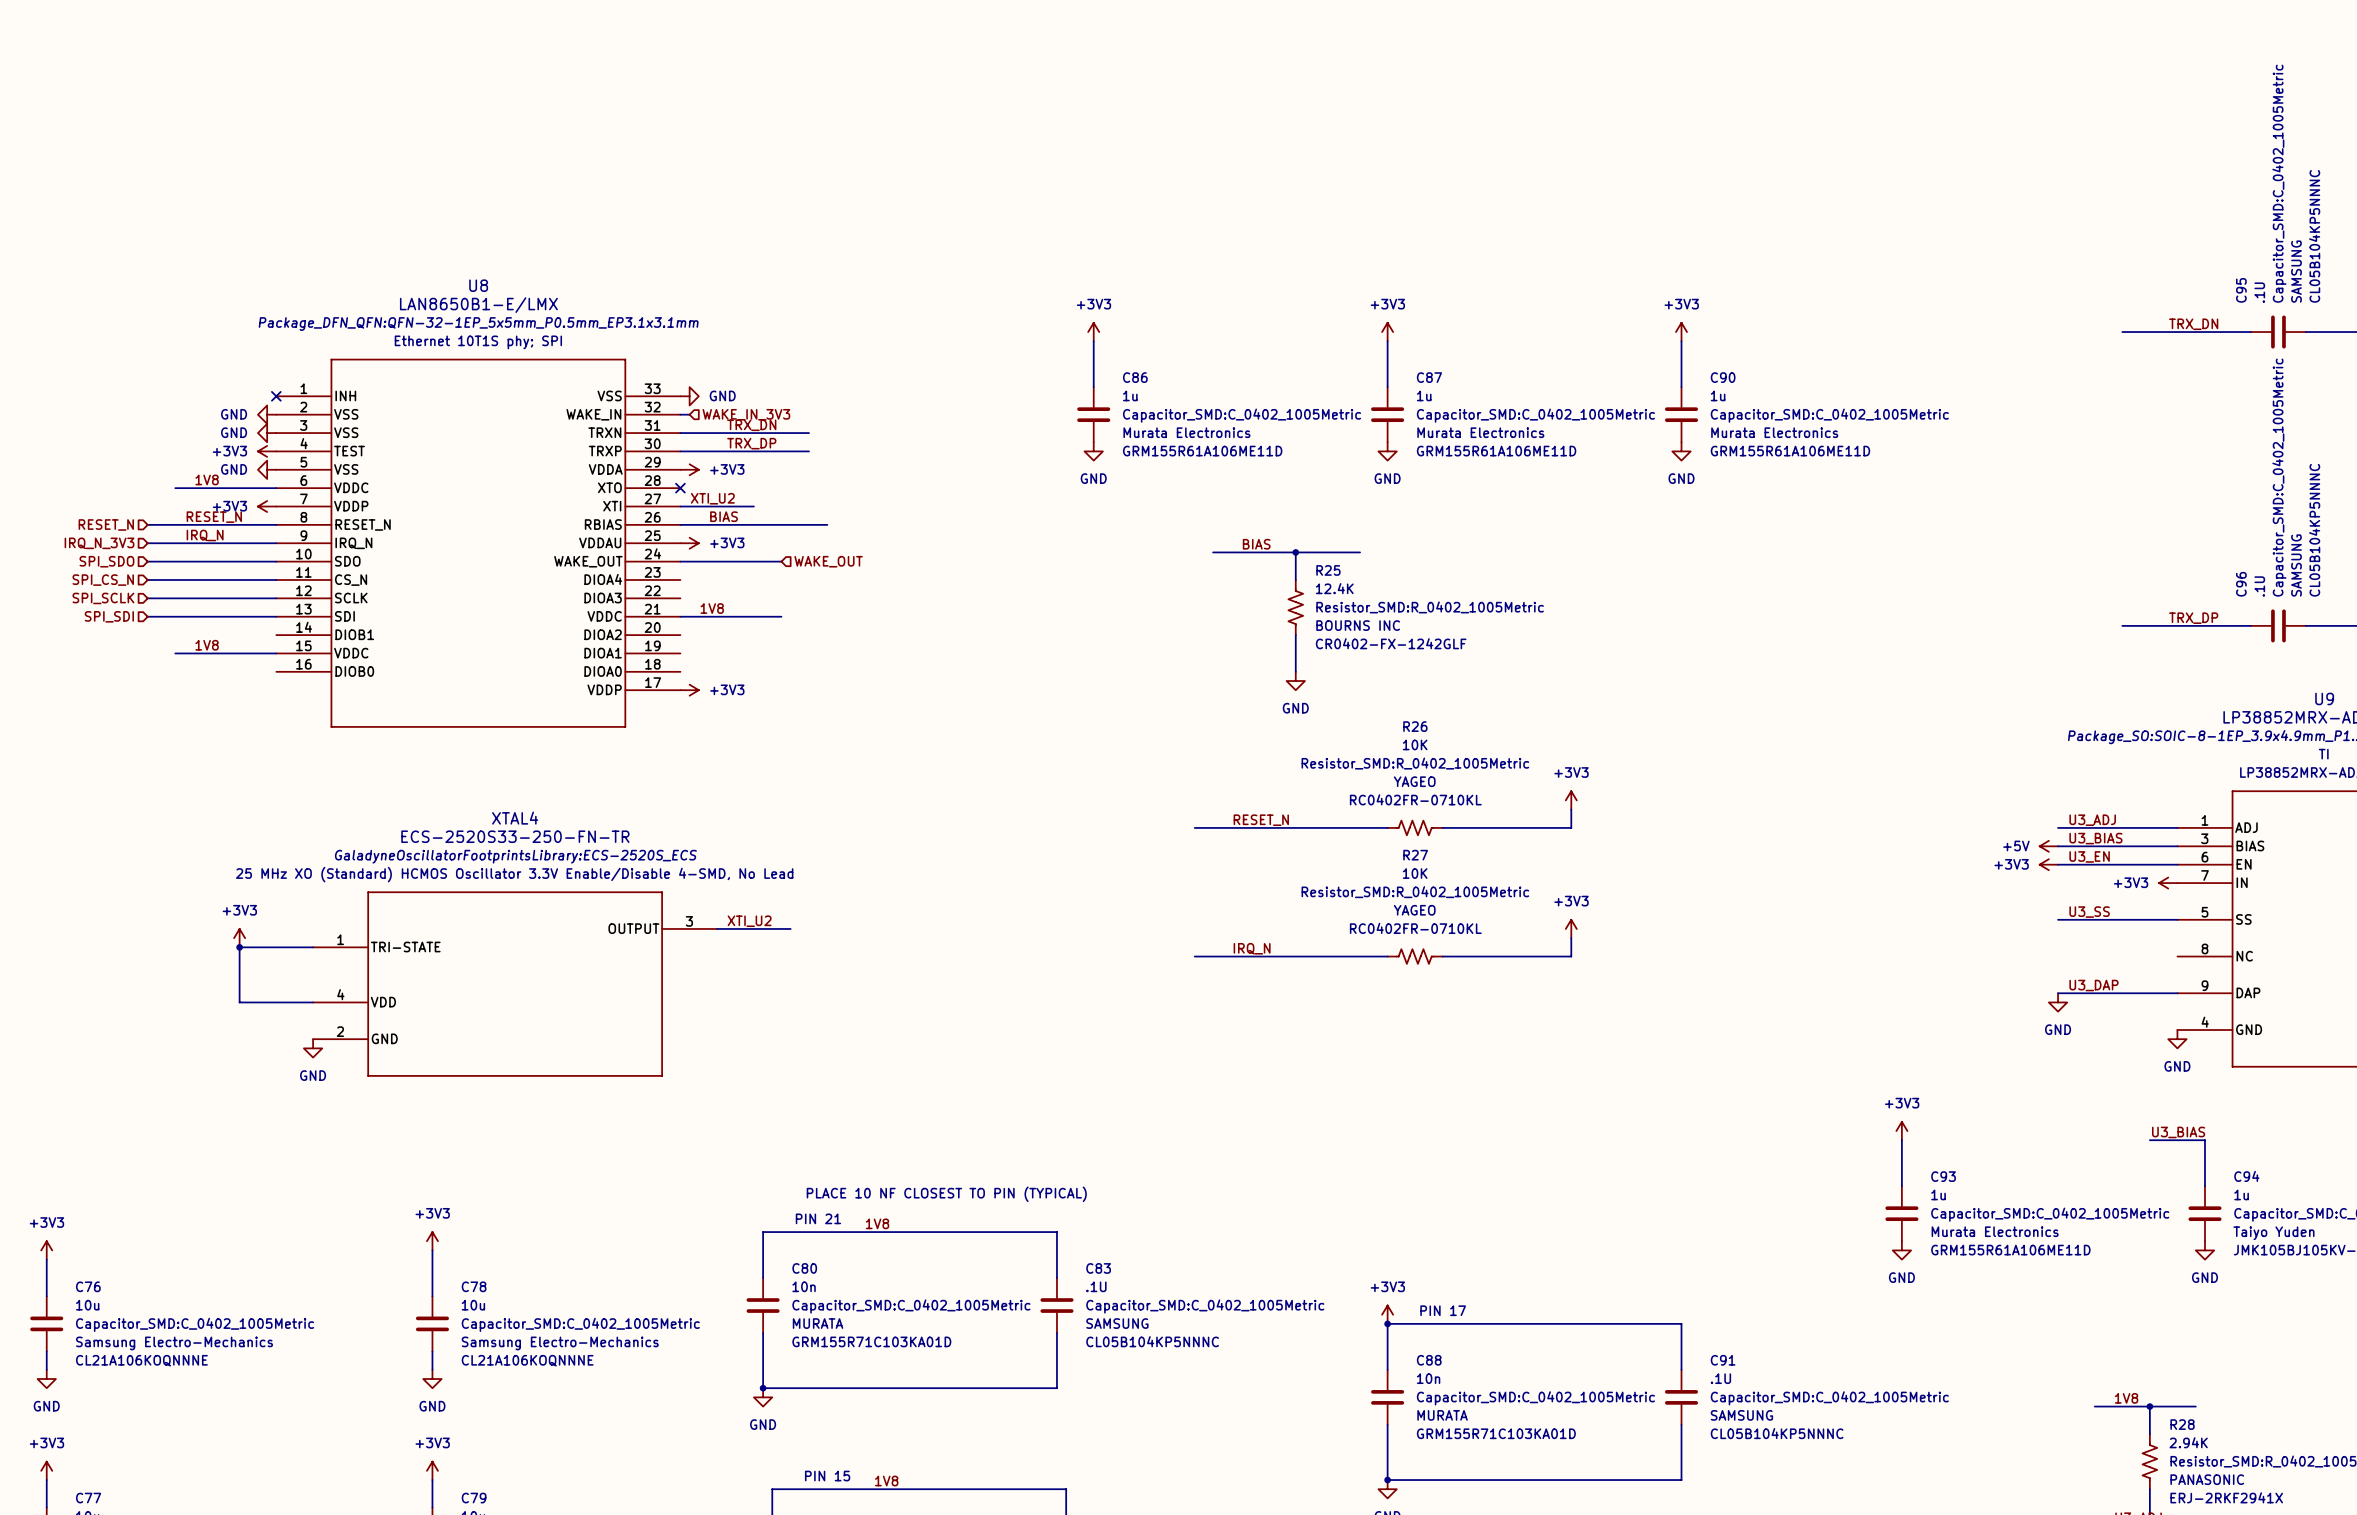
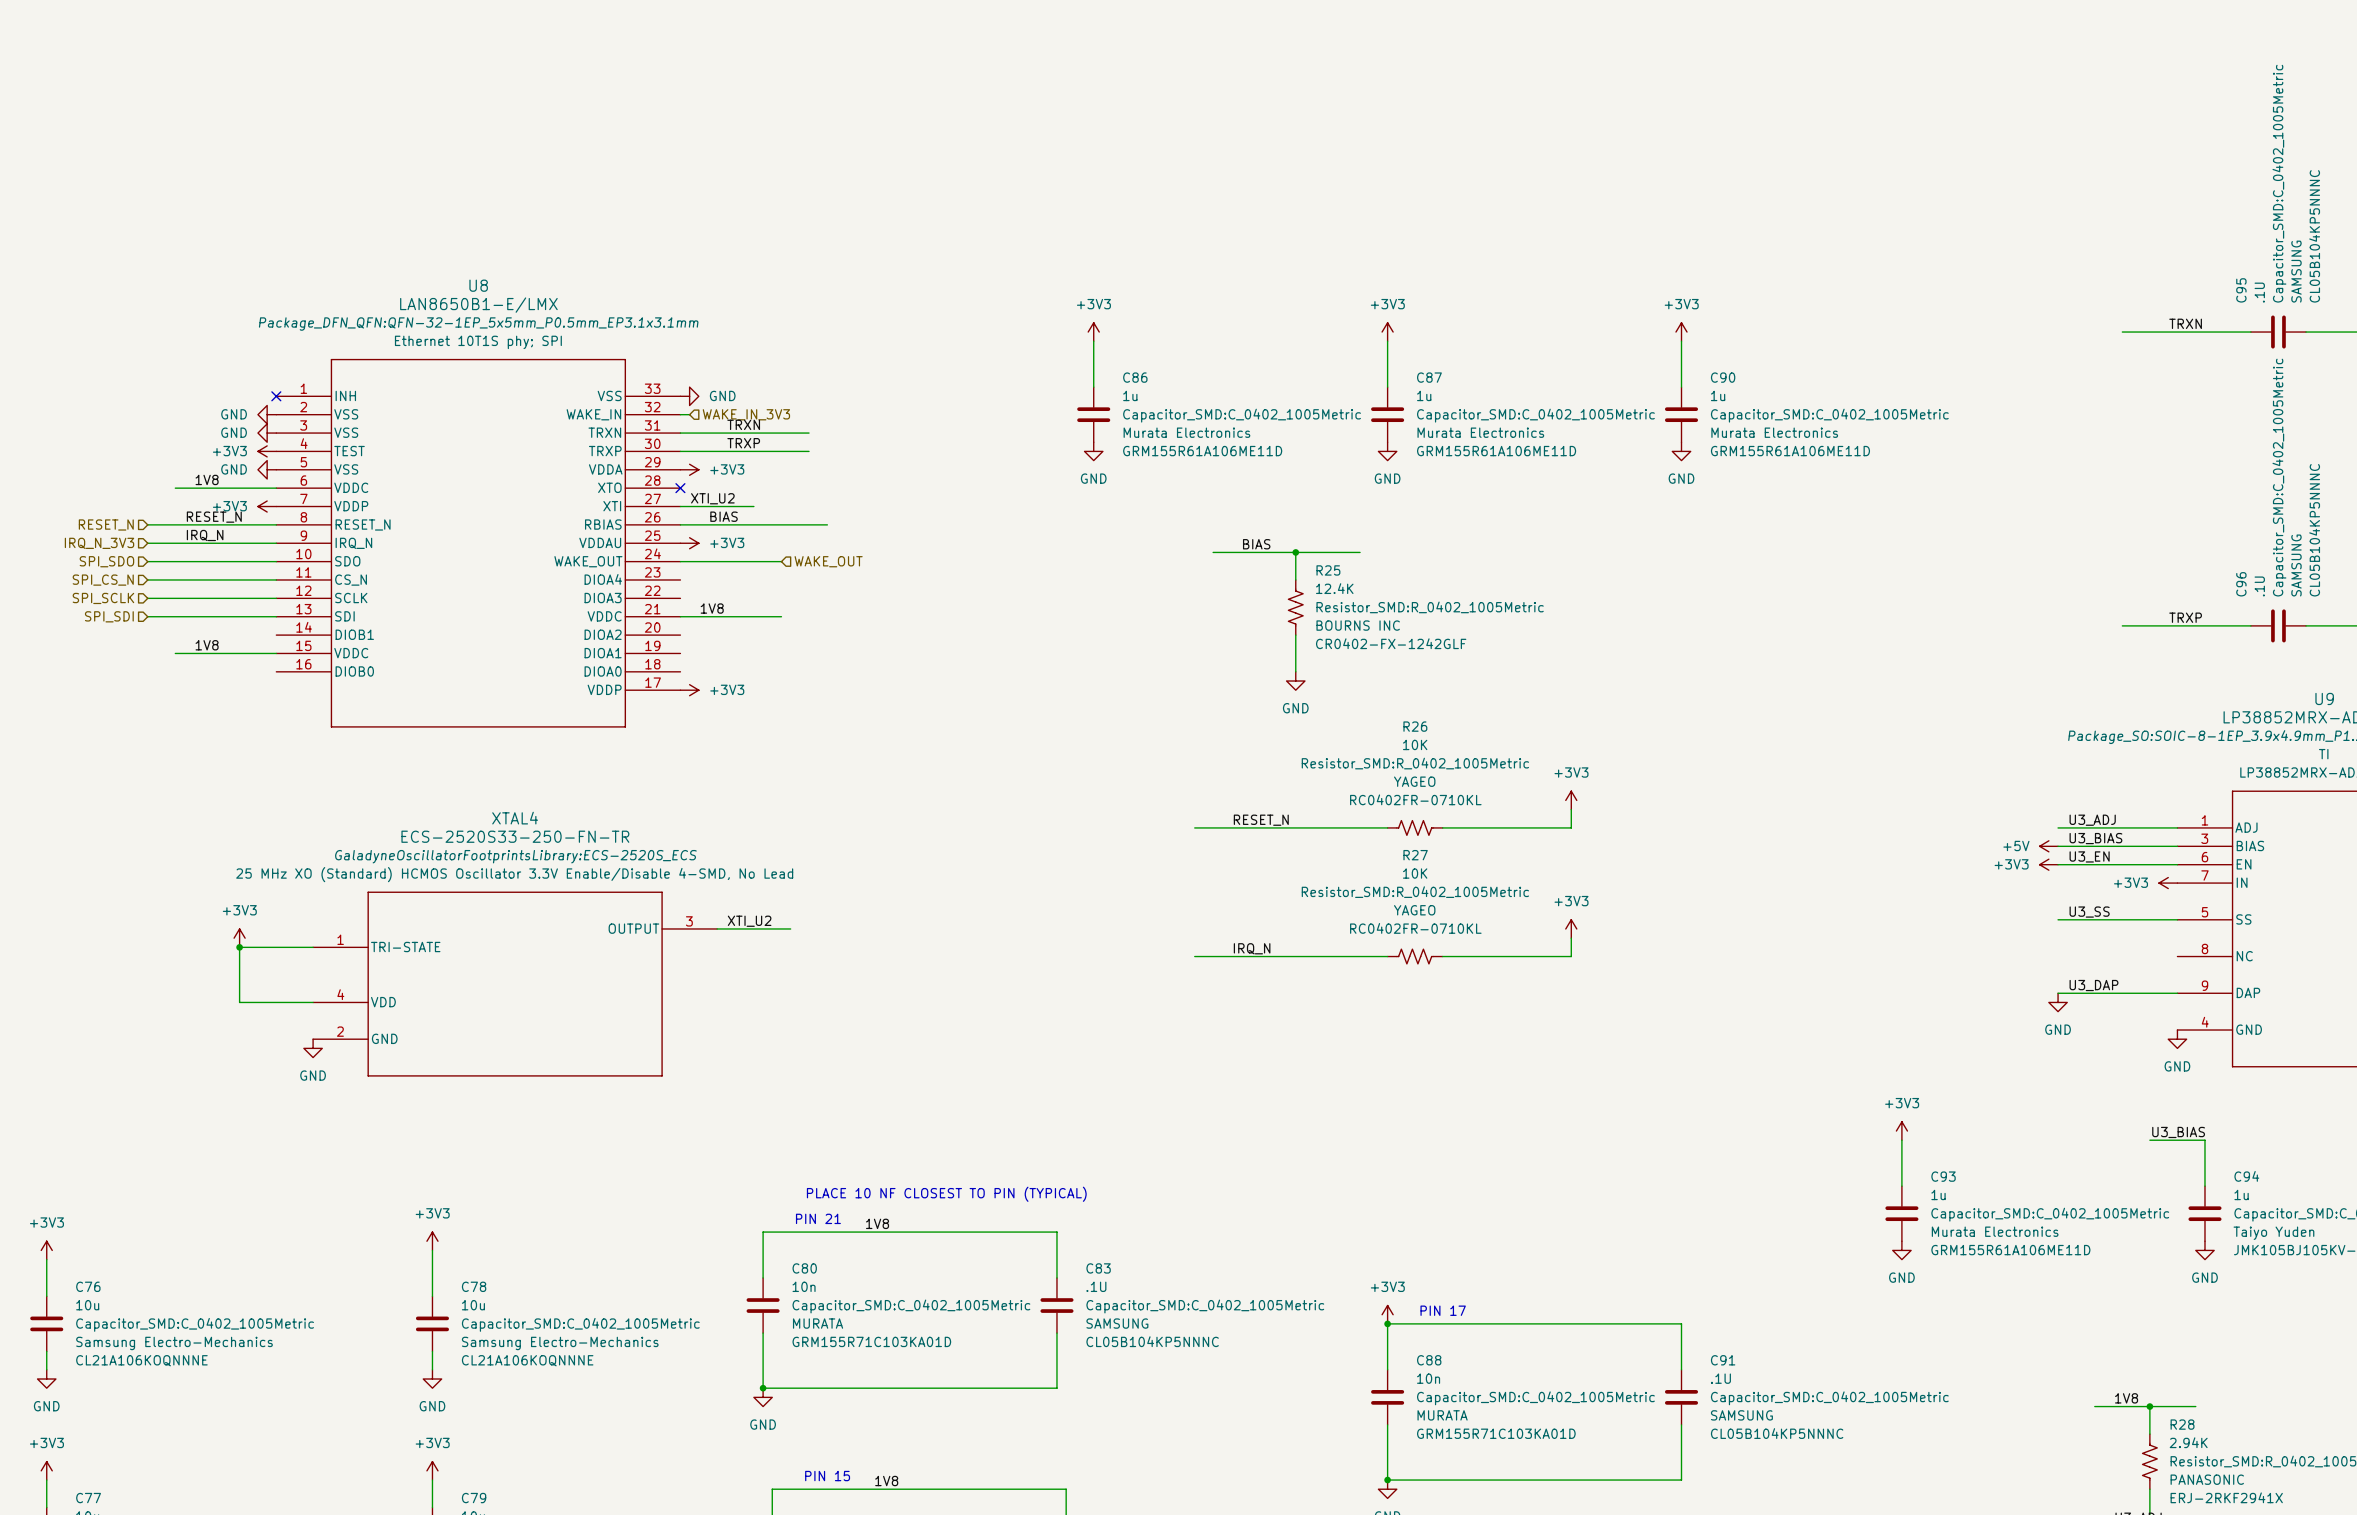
label: TRX_DN (2193, 324) -> TRXN (2185, 323)
label: TRX_DN (751, 425) -> TRXN (743, 424)
label: TRX_DP (751, 443) -> TRXP (743, 443)
label: TRX_DP (2193, 618) -> TRXP (2185, 617)

